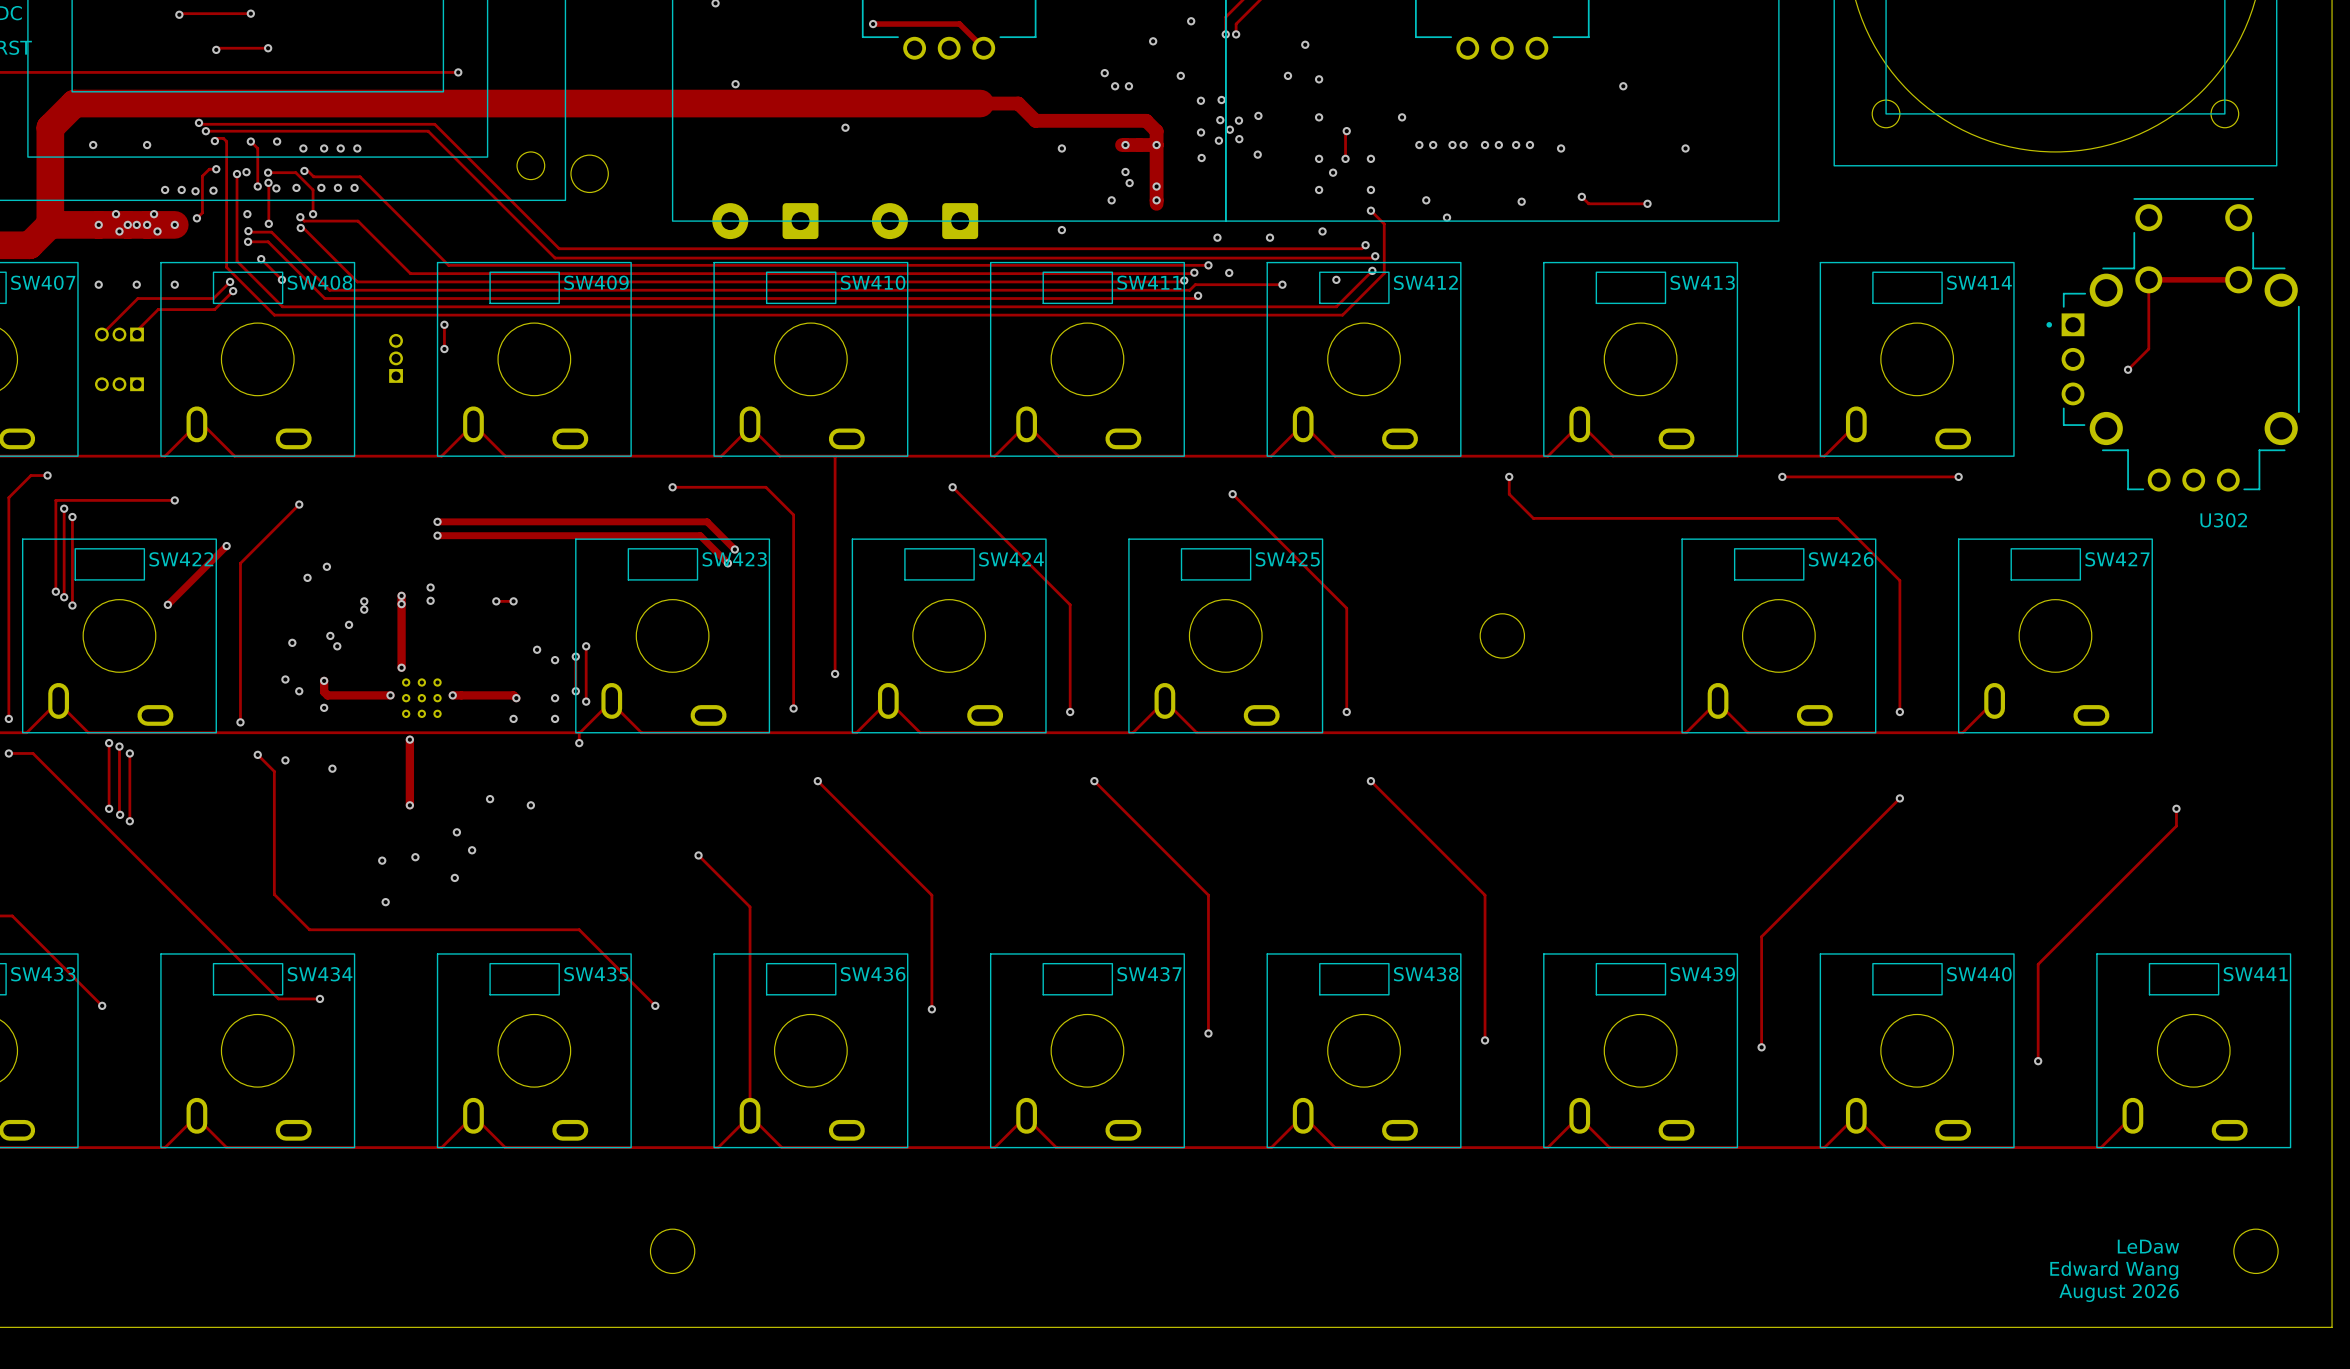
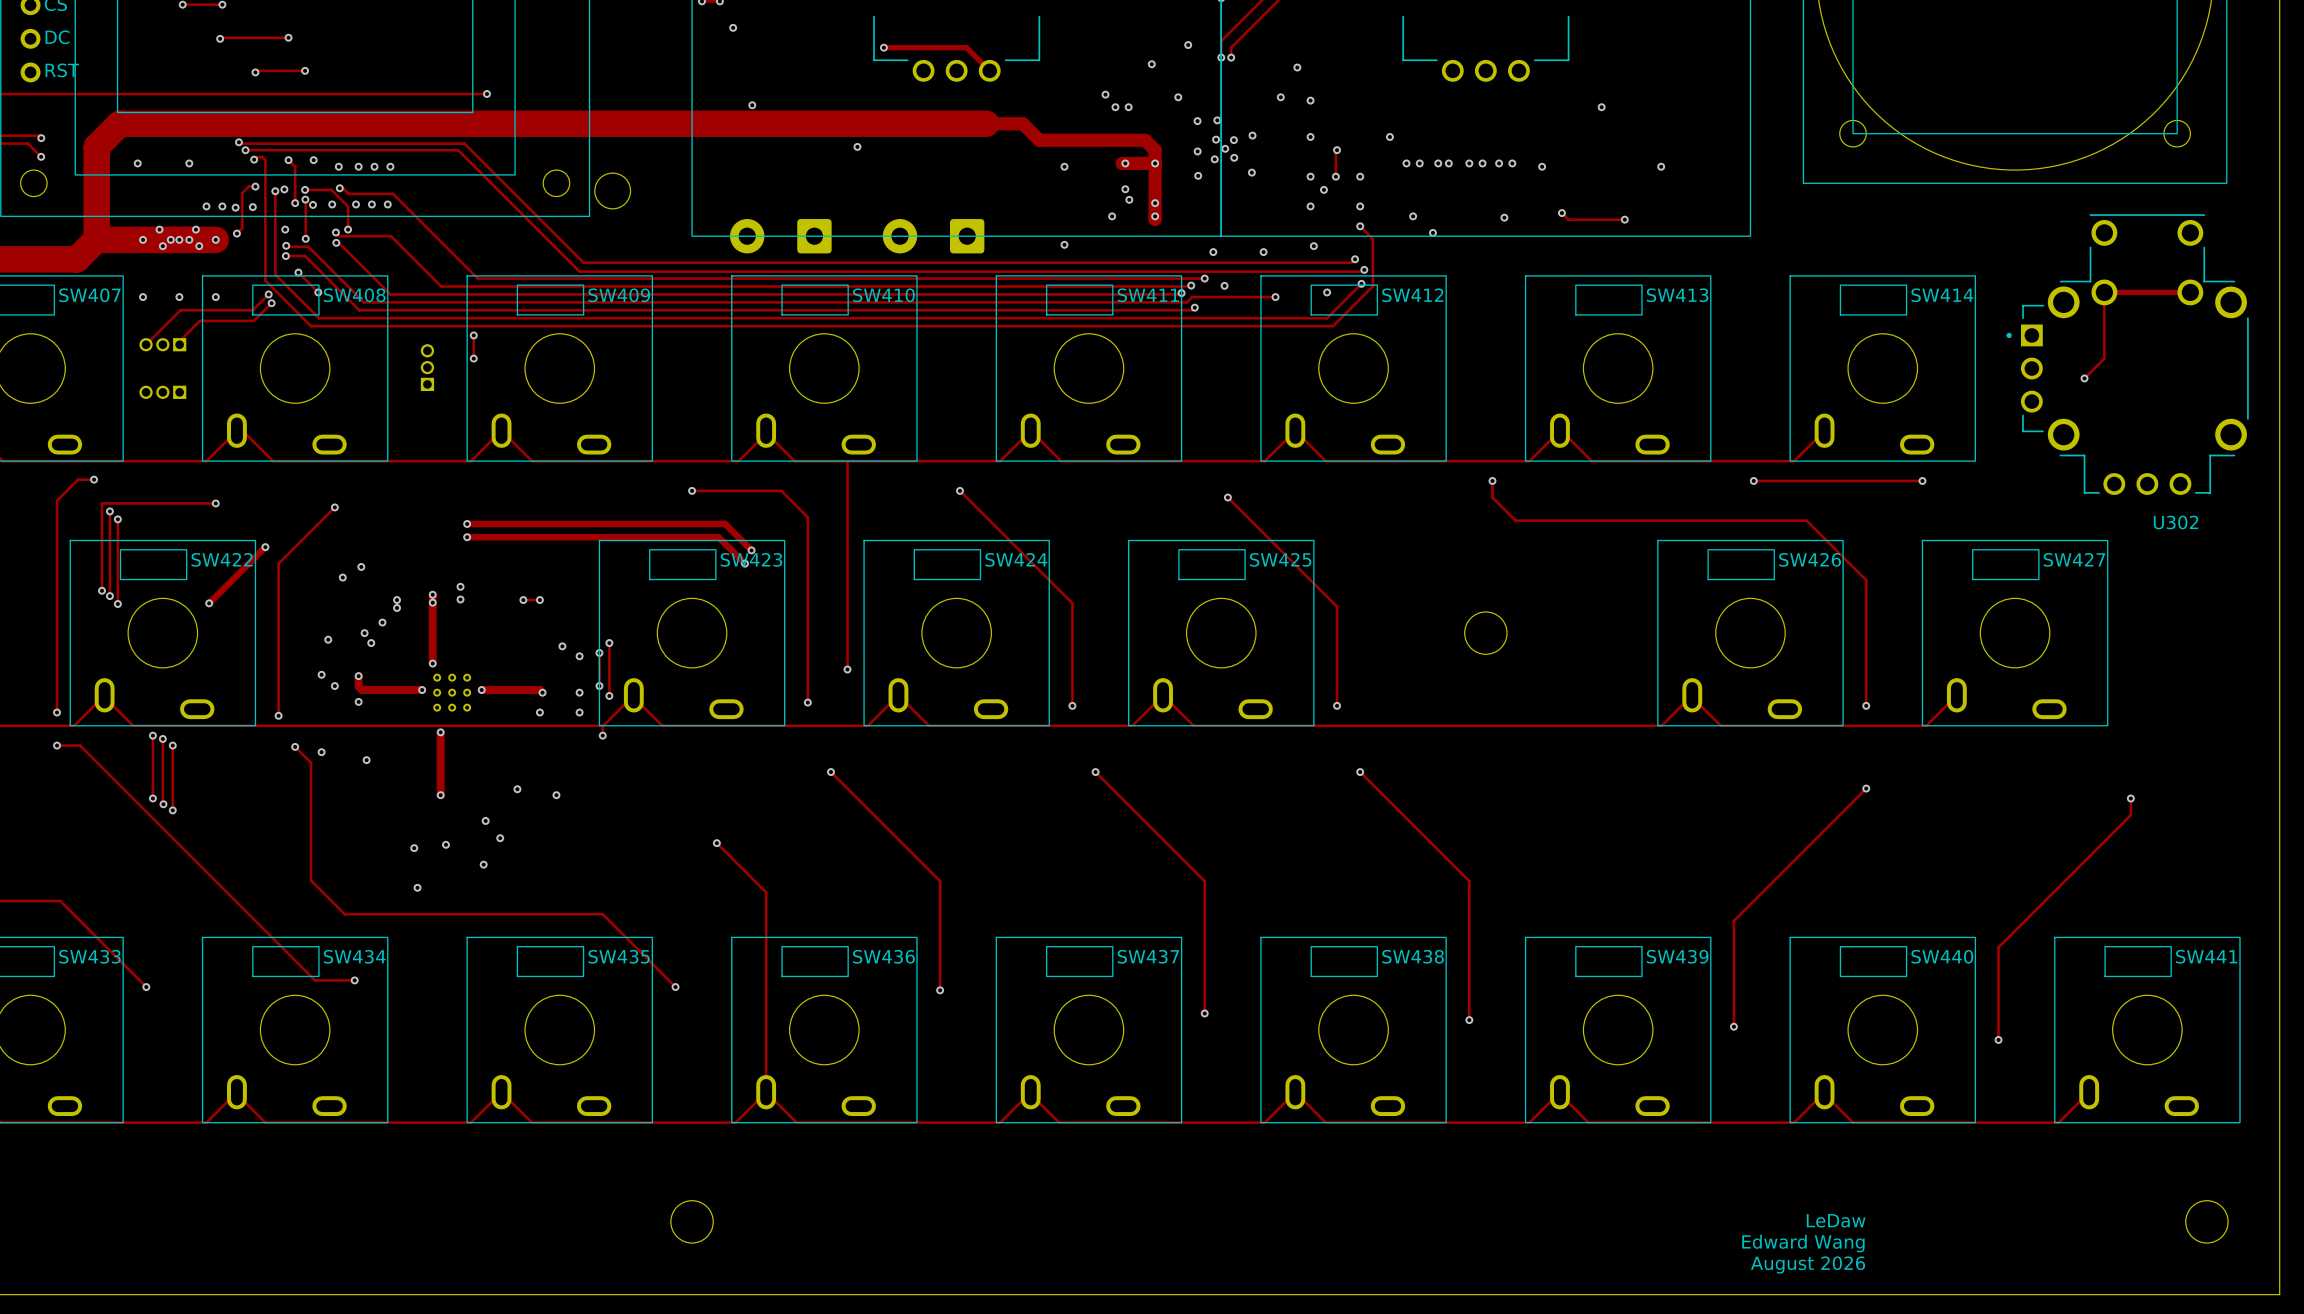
text position: LeDaw (2148, 1246) -> LeDaw (1836, 1220)
text position: Edward Wang (2114, 1270) -> Edward Wang (1803, 1243)
text position: August 2026 (2119, 1292) -> August 2026 (1808, 1265)

